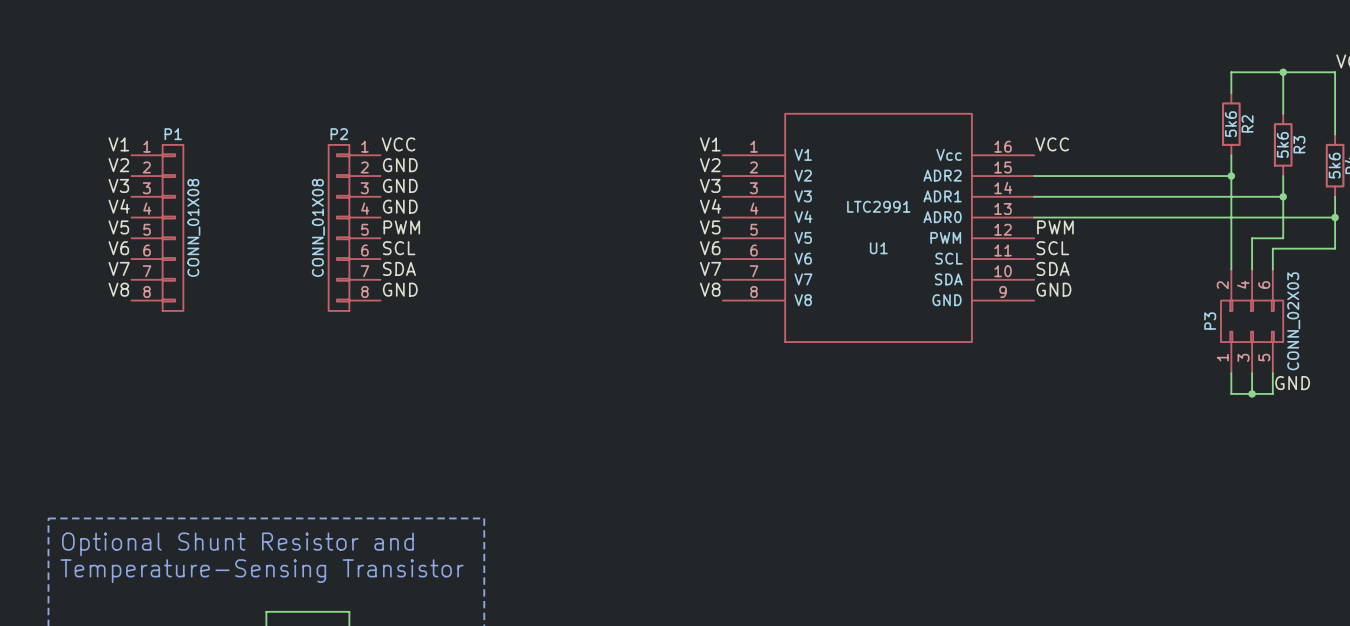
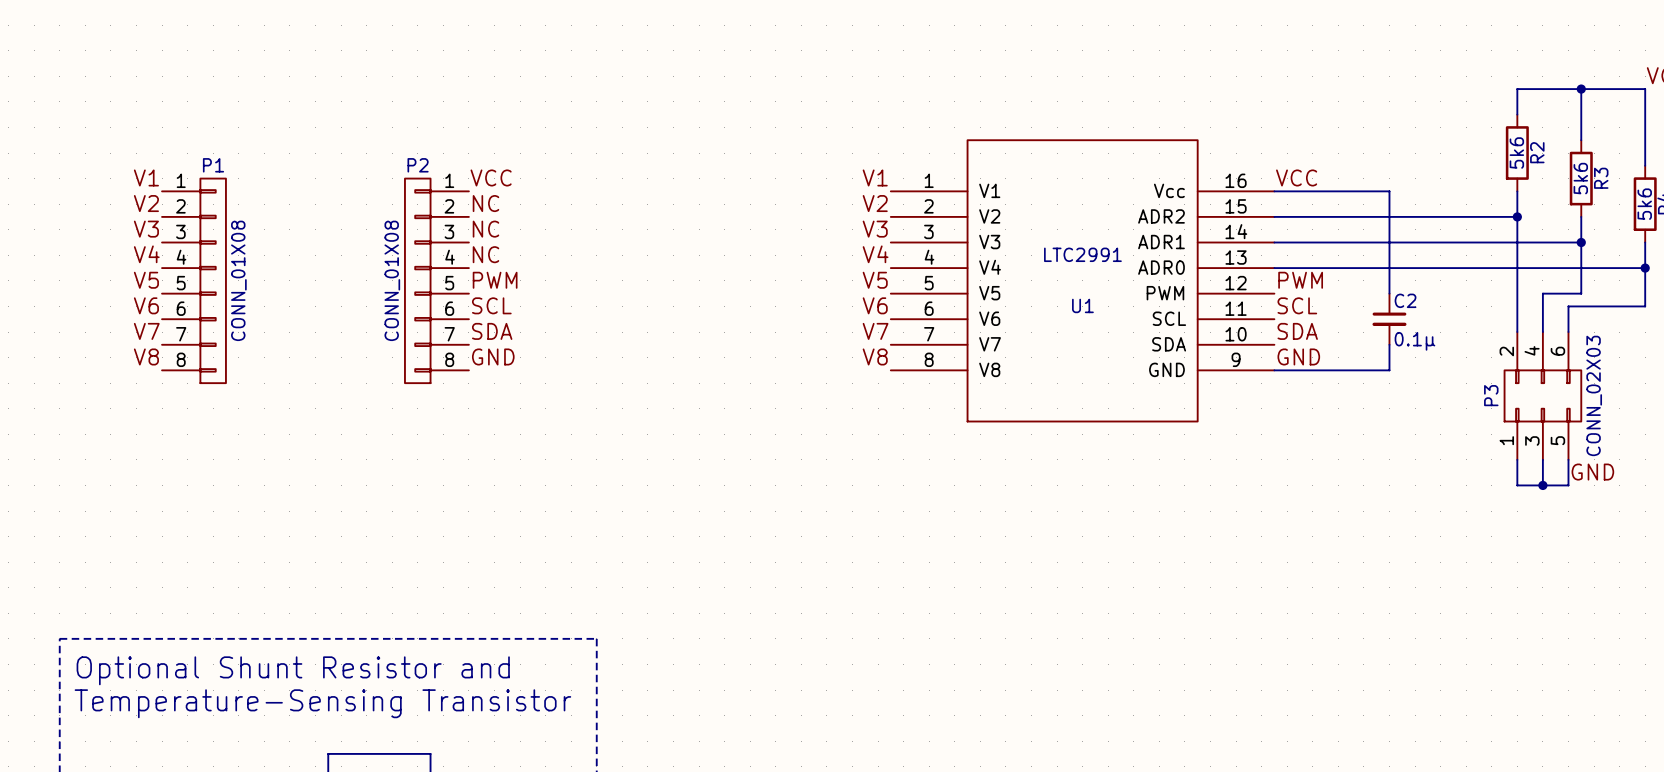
wire: none -> (1274, 191) (1389, 191) (1389, 293)
label: GND (400, 165) -> NC (485, 203)
label: GND (400, 185) -> NC (485, 229)
label: GND (400, 206) -> NC (485, 254)
C2: none -> 0.1μ (1389, 319)
wire: none -> (1389, 344) (1389, 370) (1274, 370)

